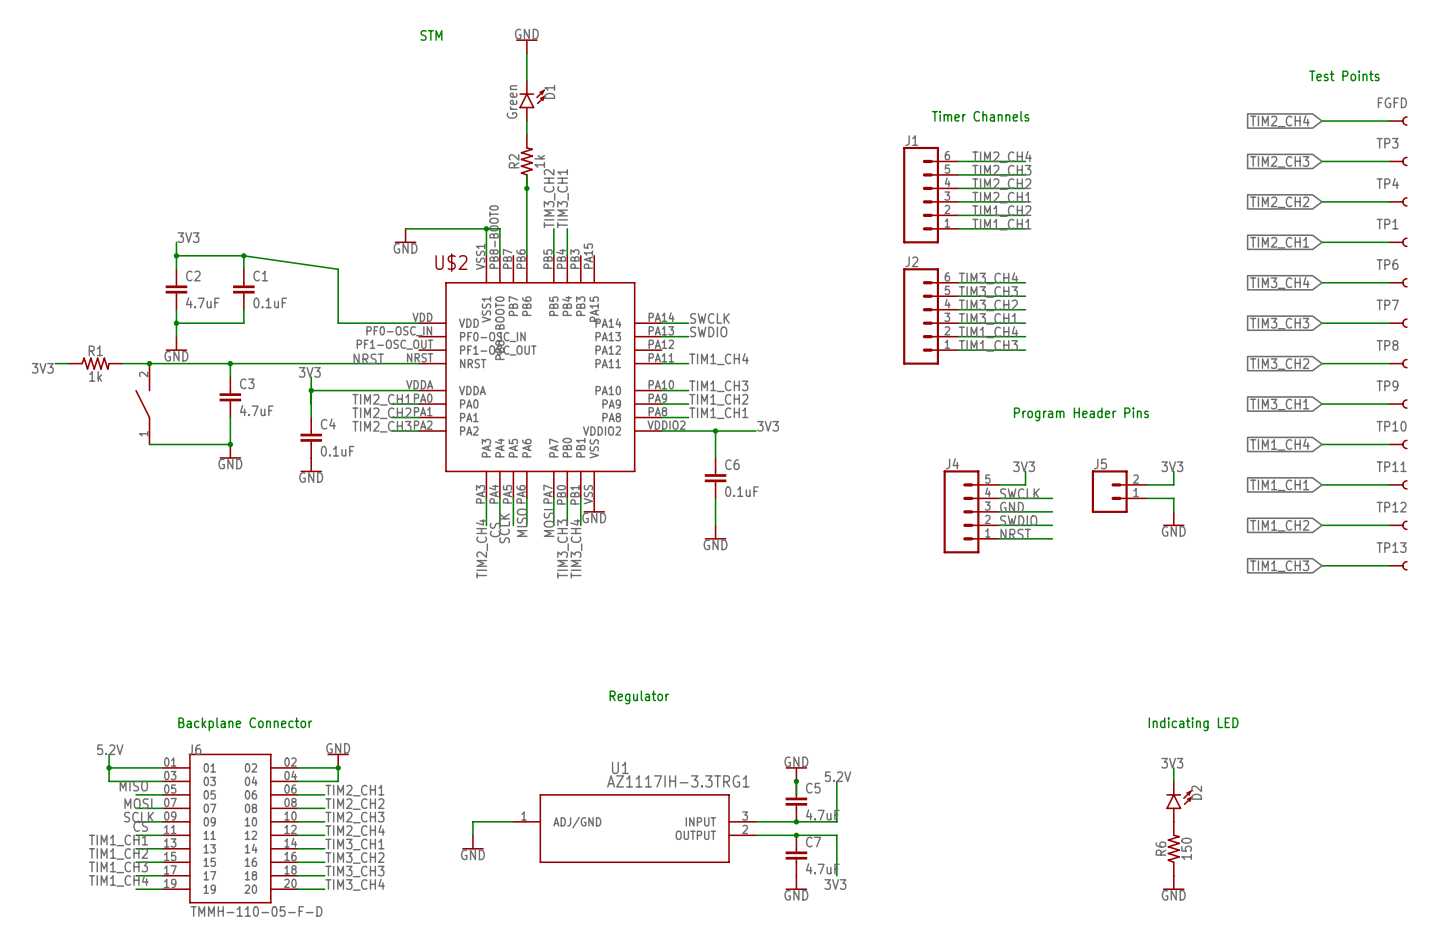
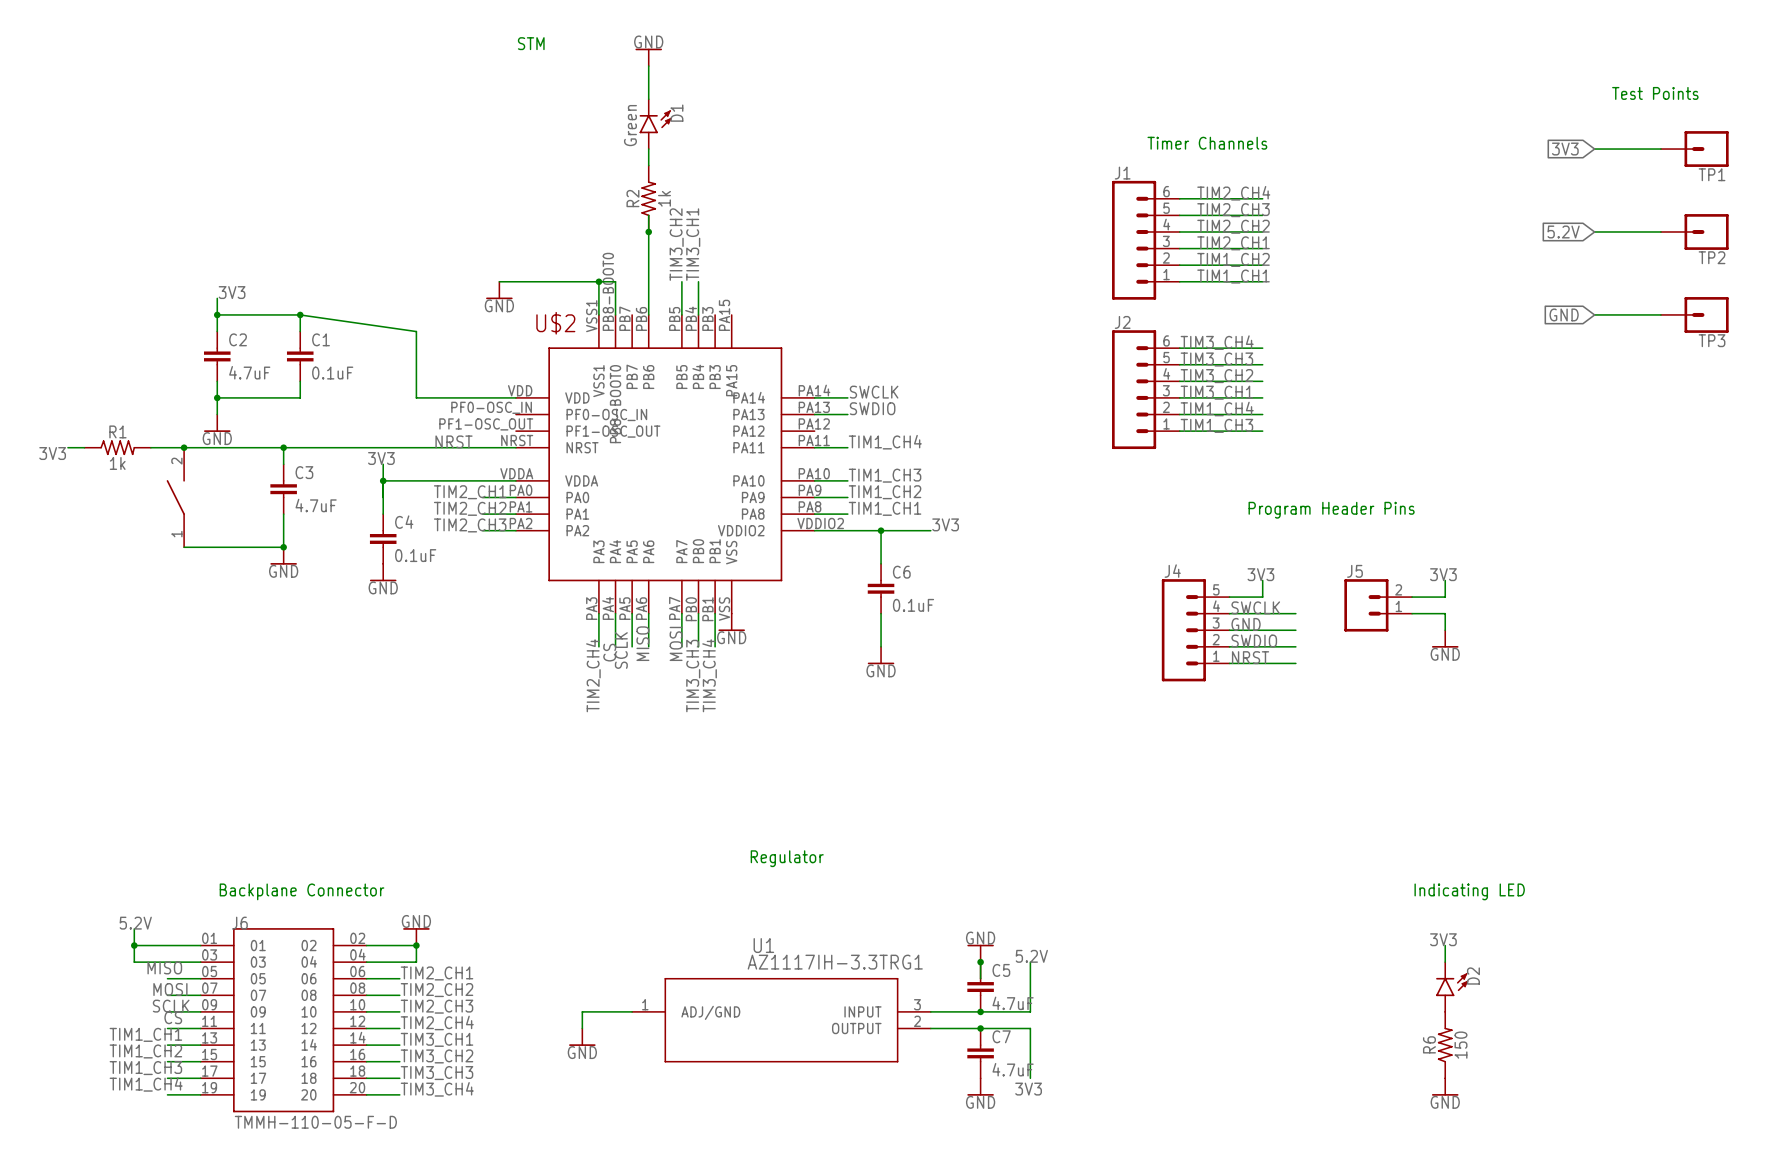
global label: none -> 3V3 (1565, 149)
global label: TIM2_CH4 (1279, 121) -> none
wire: none -> (1594, 149) (1627, 149)
FGFD: (1398, 121) -> none
TP3 name position: TP3 (1387, 143) -> TP3 (1712, 340)
TP3 symbol: [1388, 157, 1408, 166] -> [1660, 297, 1729, 333]
global label: TIM2_CH3 (1279, 161) -> none
wire: (1322, 161) (1389, 161) -> none
global label: none -> 5.2V (1563, 231)
wire: none -> (1594, 231) (1660, 231)
TP2: none -> (1694, 231)
wire: (1322, 201) (1389, 201) -> none
TP4: (1398, 201) -> none
global label: TIM2_CH2 (1279, 202) -> none
TP1 name position: TP1 (1387, 224) -> TP1 (1712, 174)
TP1 symbol: [1388, 237, 1408, 247] -> [1660, 131, 1729, 167]
global label: TIM2_CH1 (1279, 242) -> none
wire: (1322, 242) (1389, 242) -> none
global label: none -> GND (1564, 314)
wire: none -> (1594, 314) (1660, 314)
global label: TIM3_CH4 (1279, 282) -> none
wire: (1322, 282) (1389, 282) -> none
TP6: (1398, 282) -> none
global label: TIM3_CH3 (1279, 323) -> none
wire: (1322, 323) (1389, 323) -> none
TP7: (1398, 323) -> none
wire: (1322, 363) (1389, 363) -> none
TP8: (1398, 363) -> none
global label: TIM3_CH2 (1279, 364) -> none
global label: TIM3_CH1 (1279, 404) -> none
wire: (1322, 404) (1389, 404) -> none
TP9: (1398, 404) -> none
global label: TIM1_CH4 (1279, 444) -> none
wire: (1322, 444) (1389, 444) -> none
TP10: (1398, 444) -> none
wire: (1322, 484) (1389, 484) -> none
TP11: (1398, 484) -> none
global label: TIM1_CH1 (1279, 485) -> none
global label: TIM1_CH2 (1279, 525) -> none
wire: (1322, 525) (1389, 525) -> none
TP12: (1398, 525) -> none
wire: (1322, 565) (1389, 565) -> none
TP13: (1398, 565) -> none
global label: TIM1_CH3 (1279, 566) -> none

